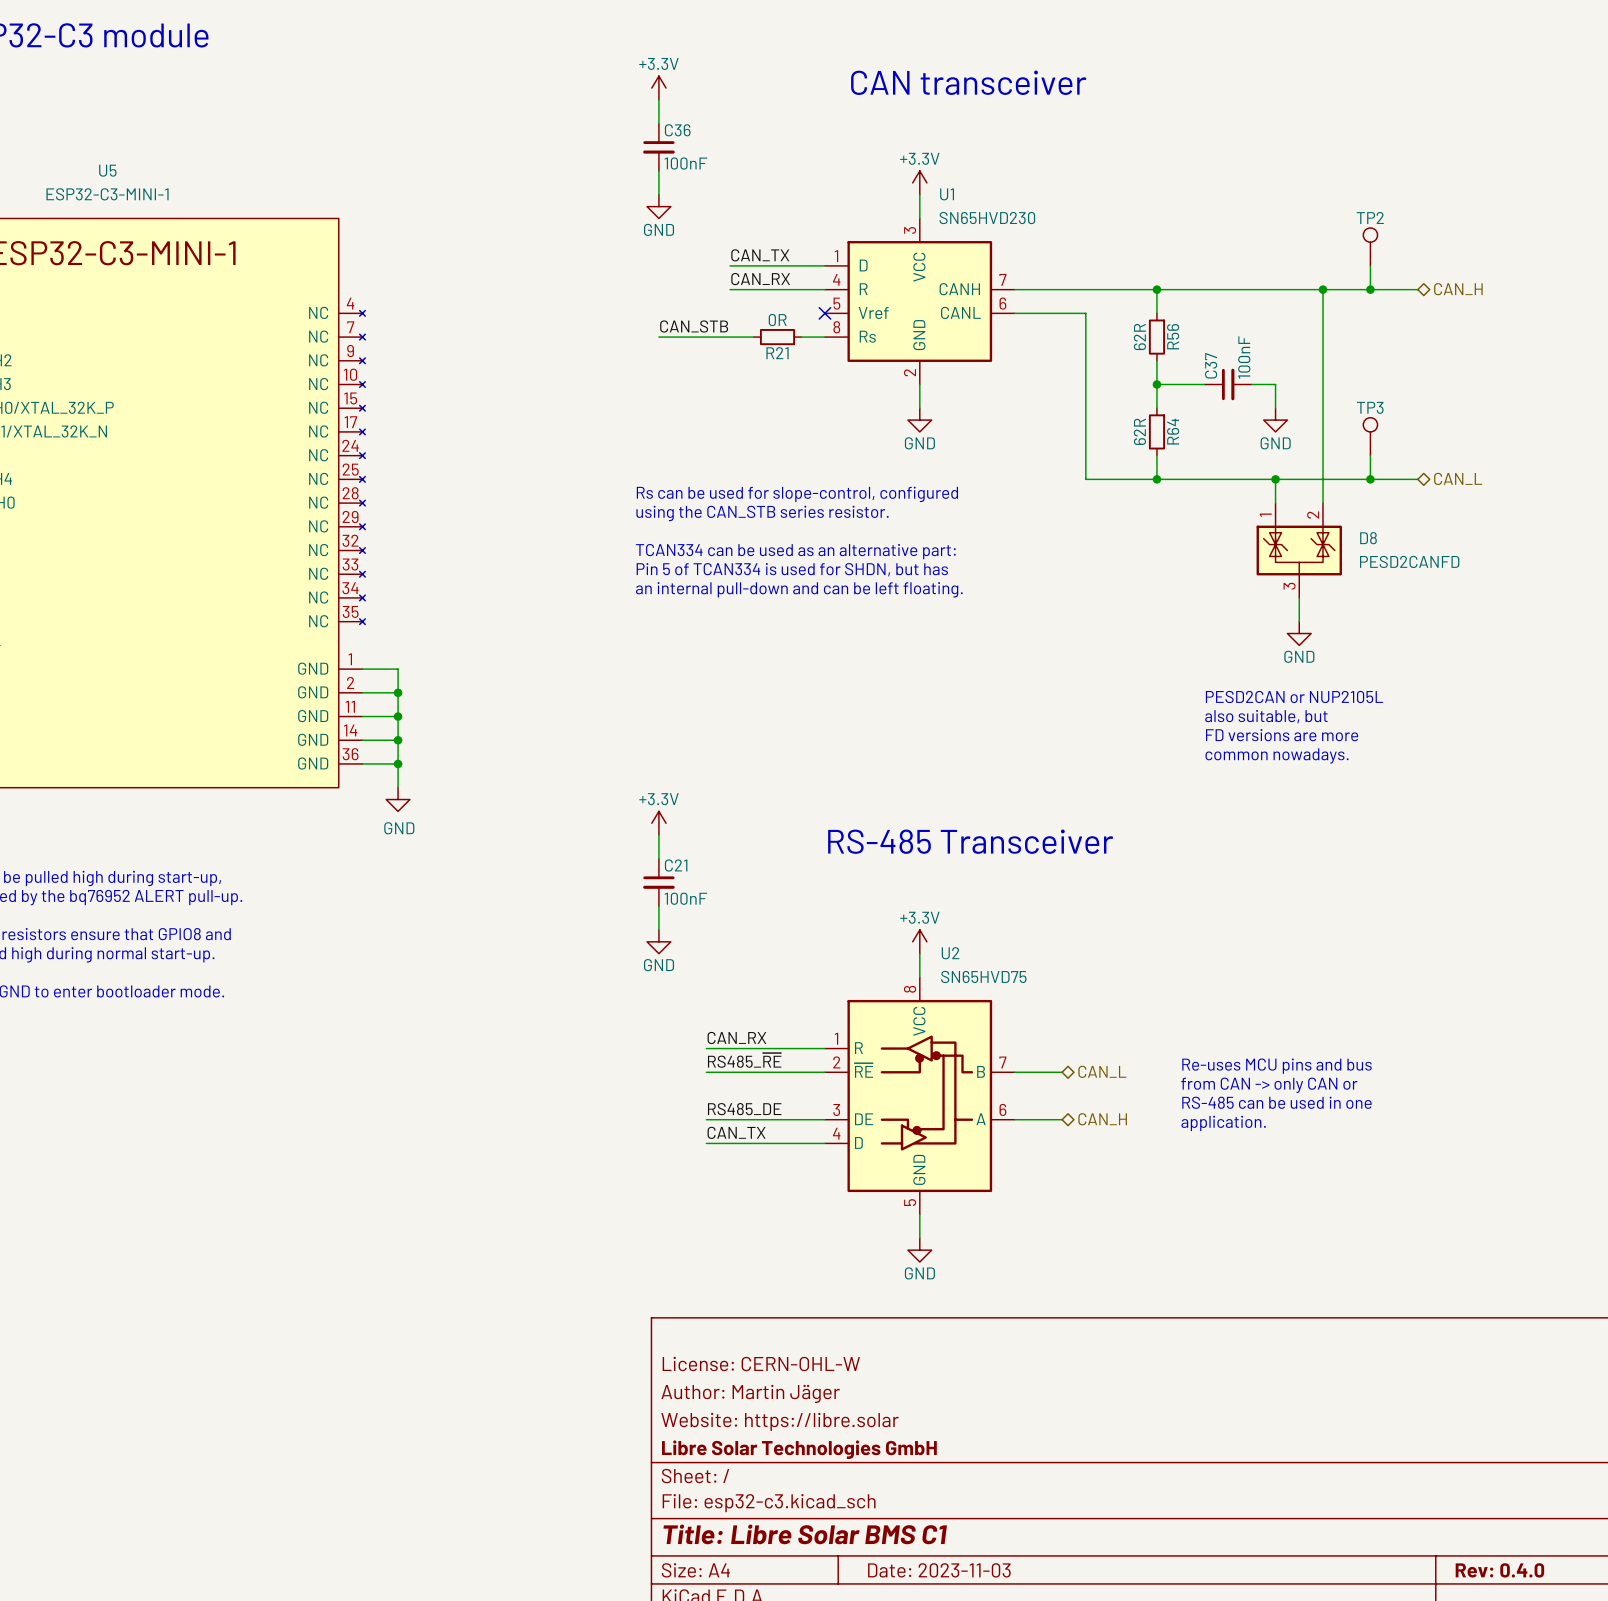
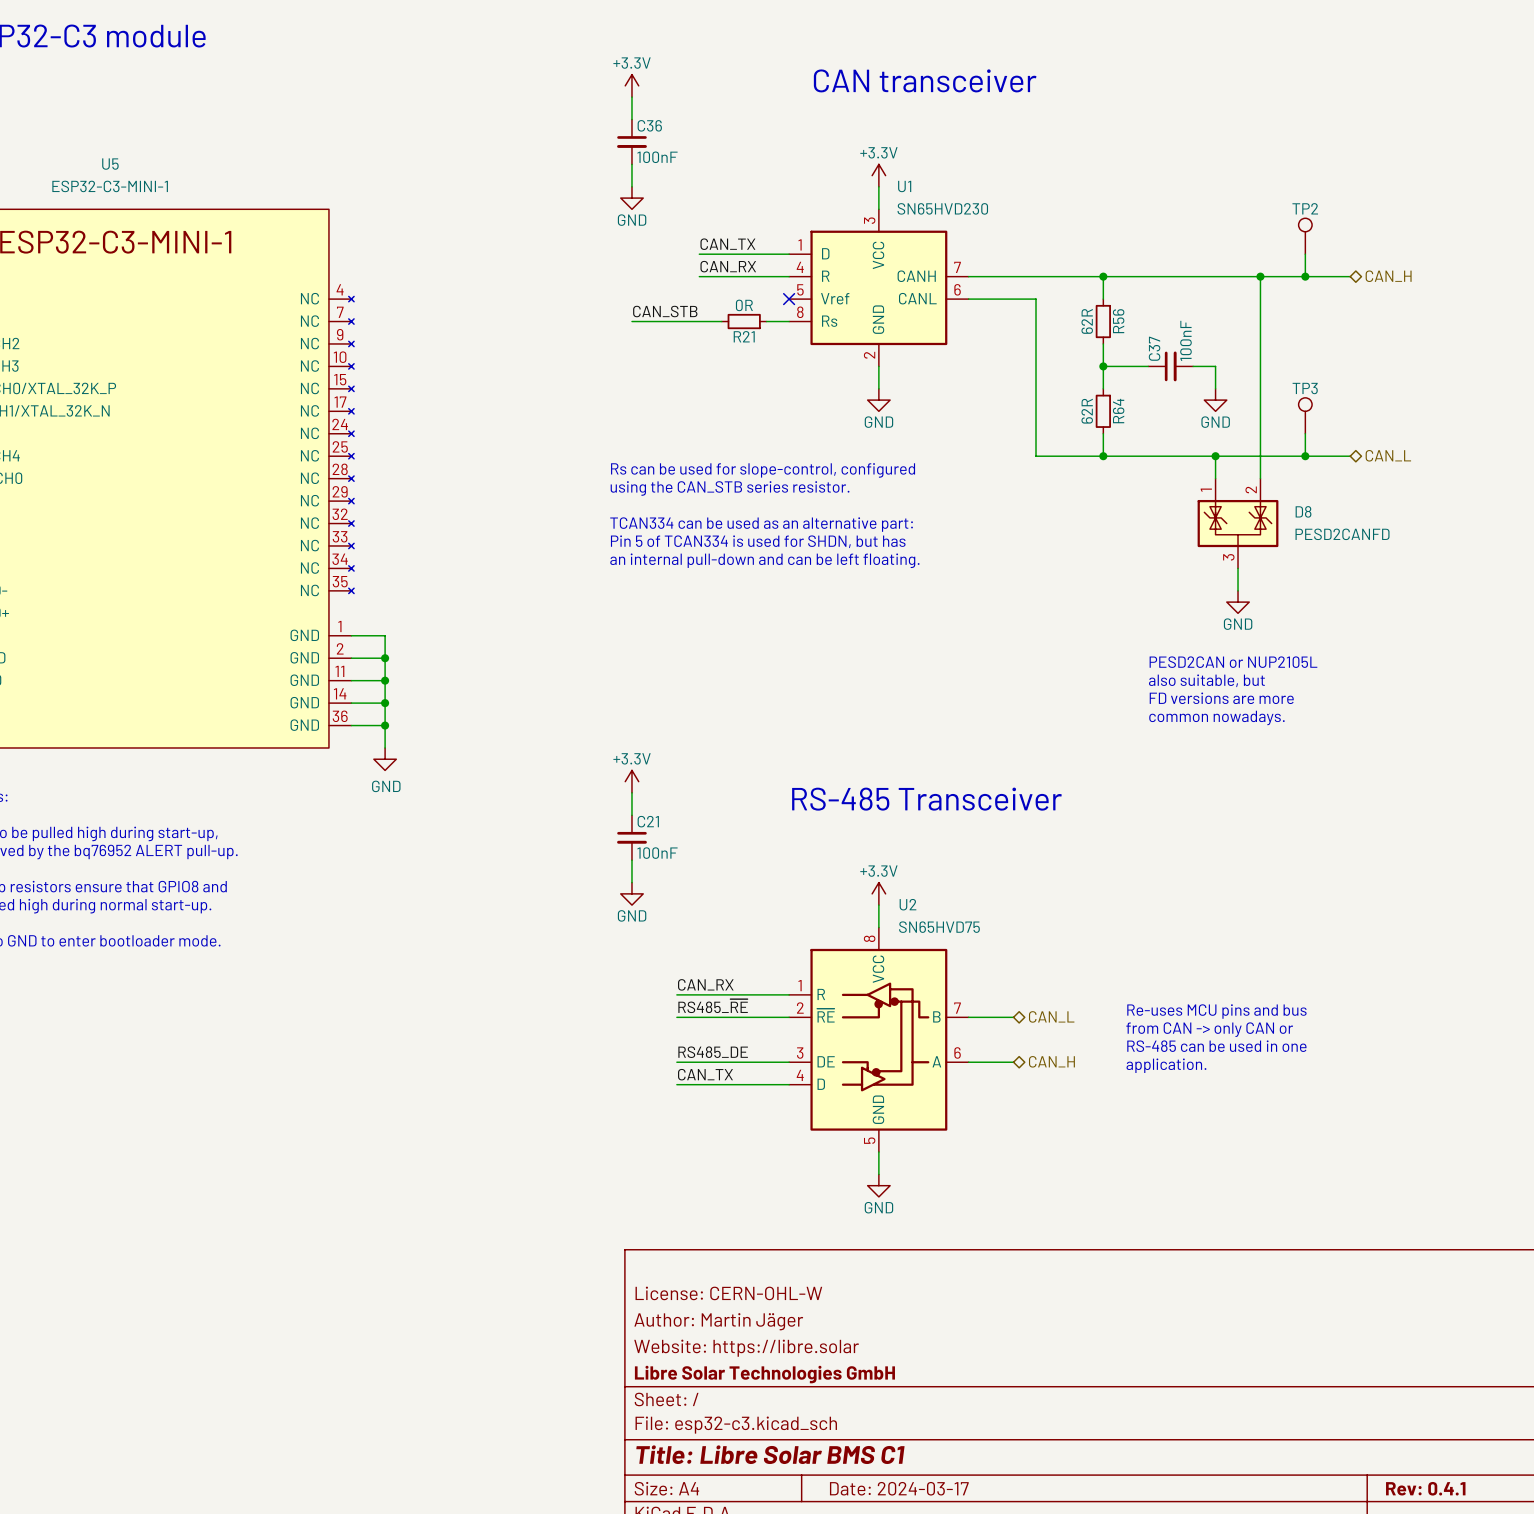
title block: Date: 2023-11-03 (939, 1570) -> Date: 2024-03-17 (899, 1488)
title block: Rev: 0.4.0 (1499, 1570) -> Rev: 0.4.1 (1425, 1488)

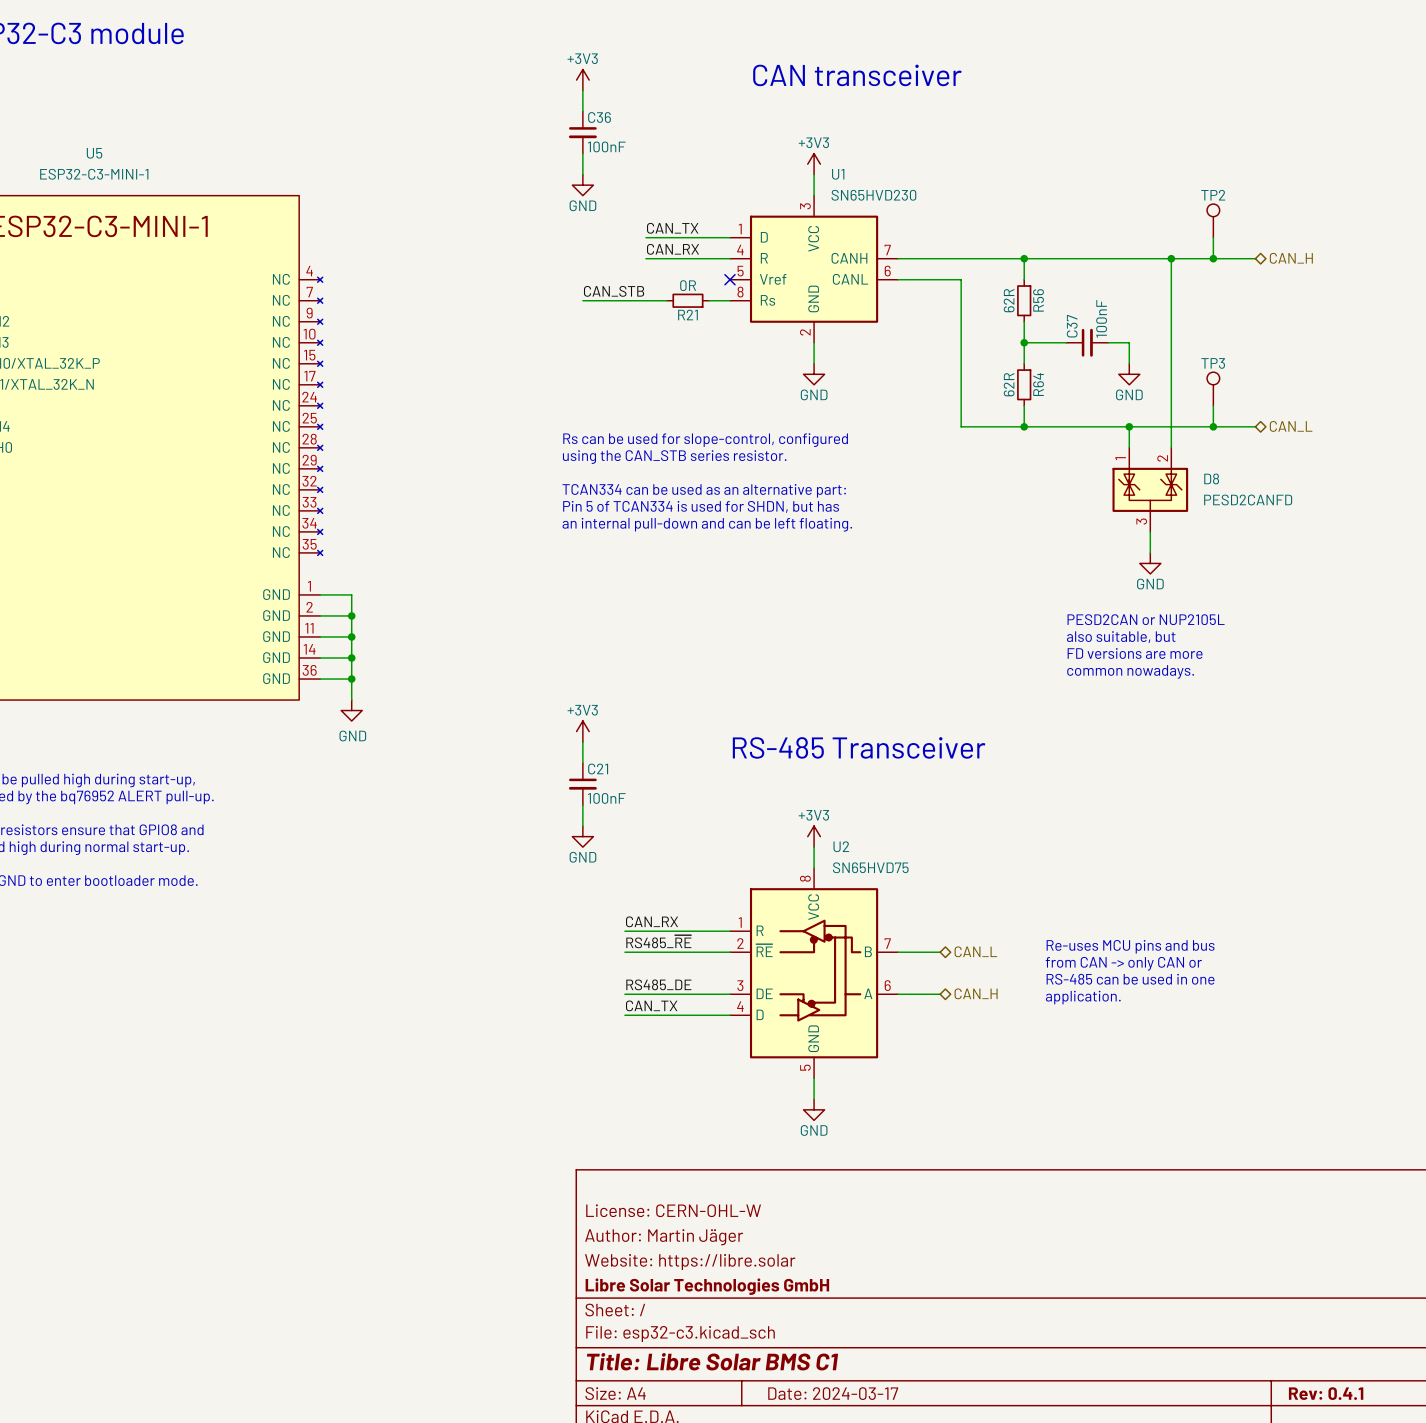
power symbol: +3.3V (631, 85) -> +3V3 (582, 80)
power symbol: +3.3V (878, 175) -> +3V3 (814, 164)
power symbol: +3.3V (631, 781) -> +3V3 (582, 731)
power symbol: +3.3V (878, 893) -> +3V3 (814, 836)

